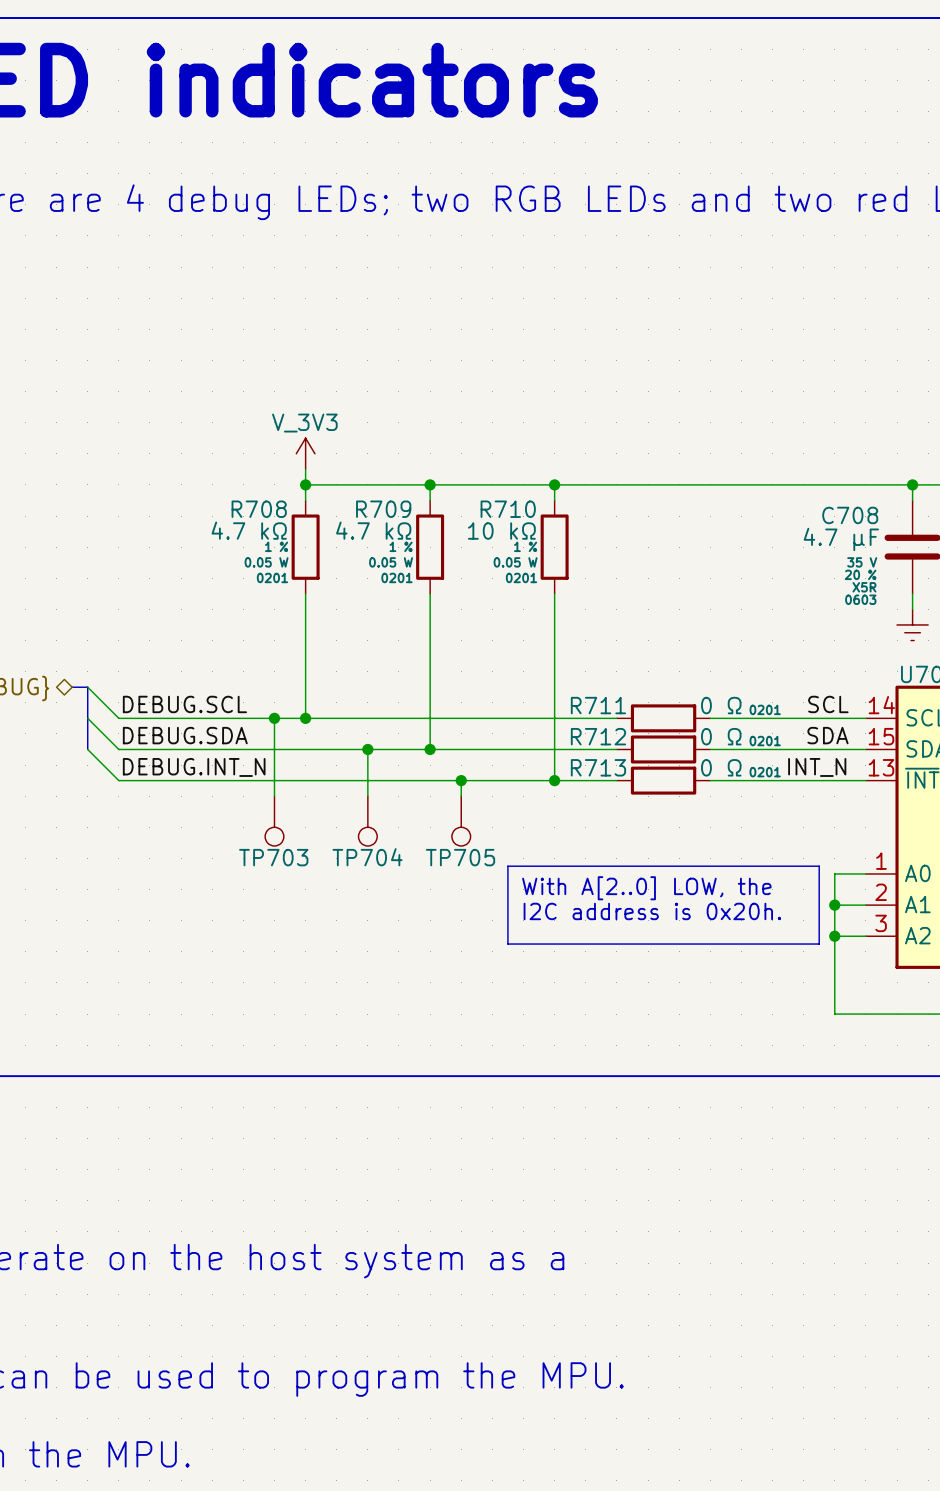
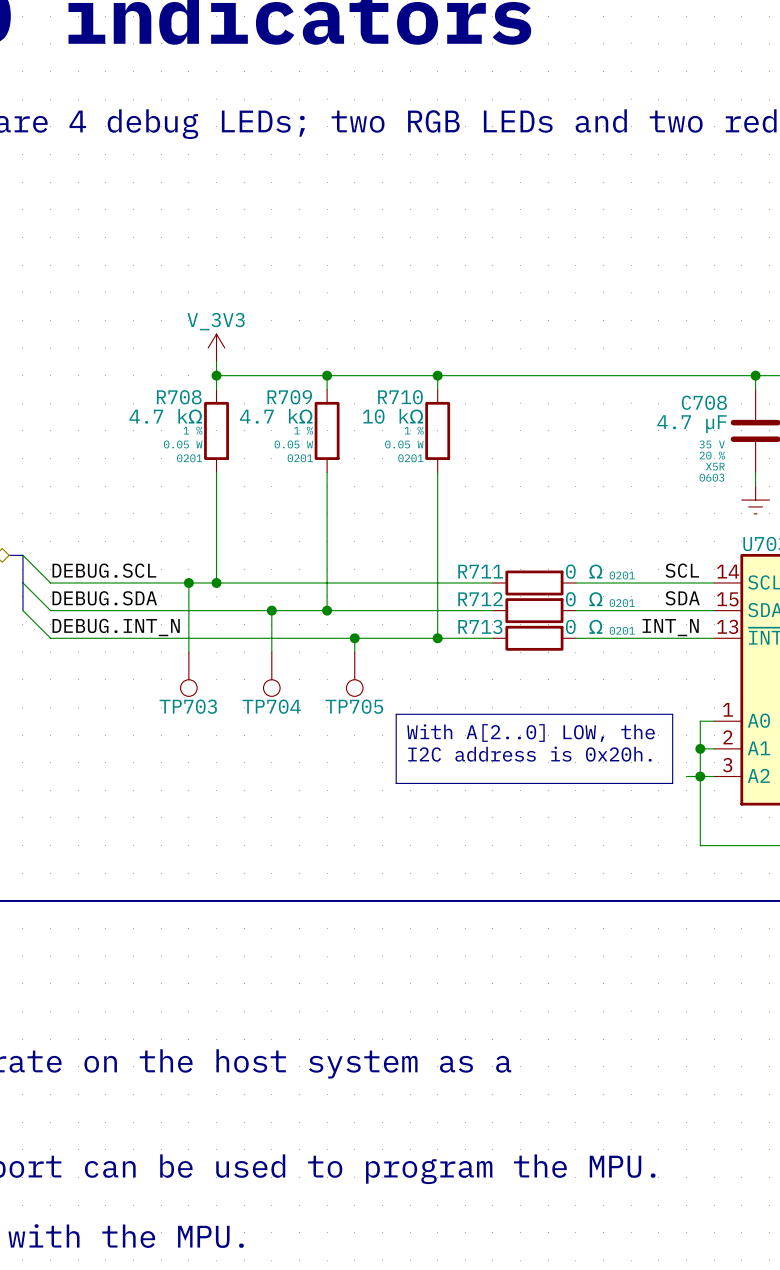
wire: (850, 873) (834, 873) (834, 1014) (850, 1014) -> (700, 721) (700, 845)
wire: (834, 905) (850, 905) -> none
junction position: (834, 905) -> (700, 748)
junction position: (834, 936) -> (700, 776)

